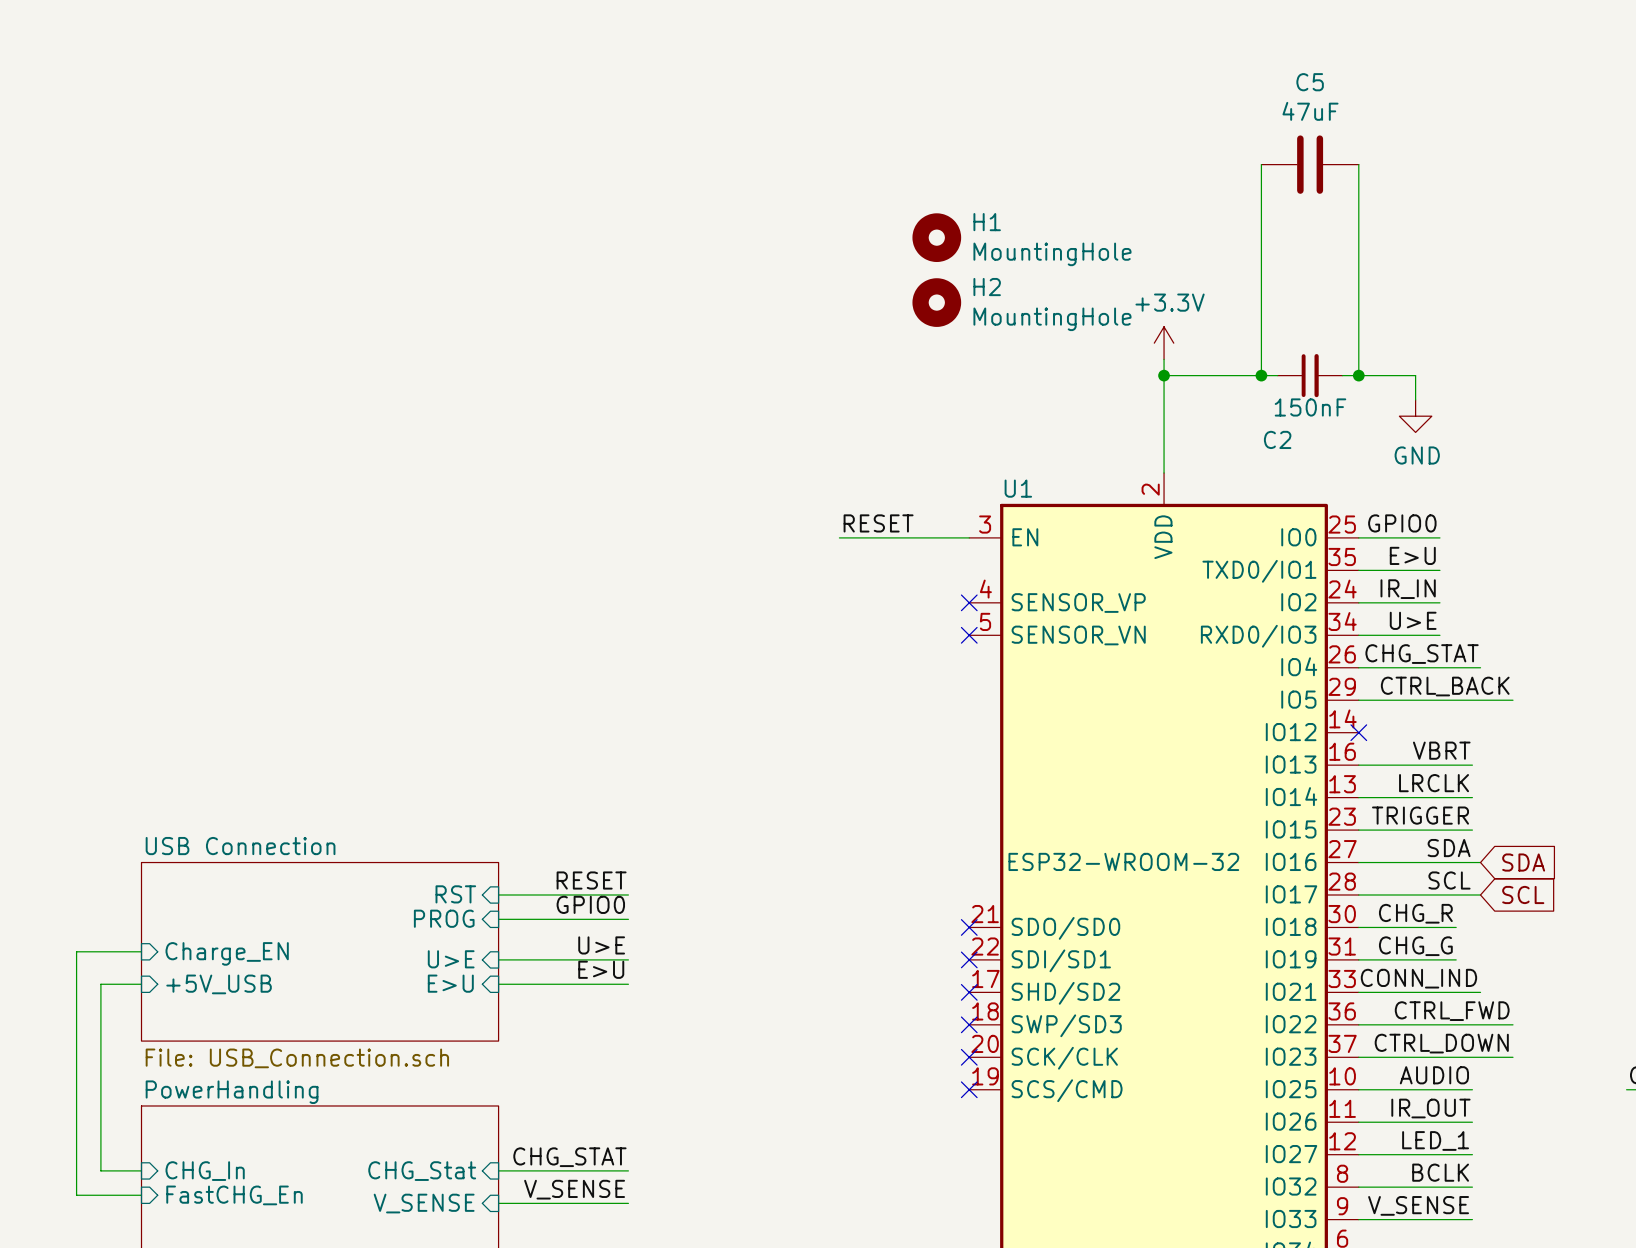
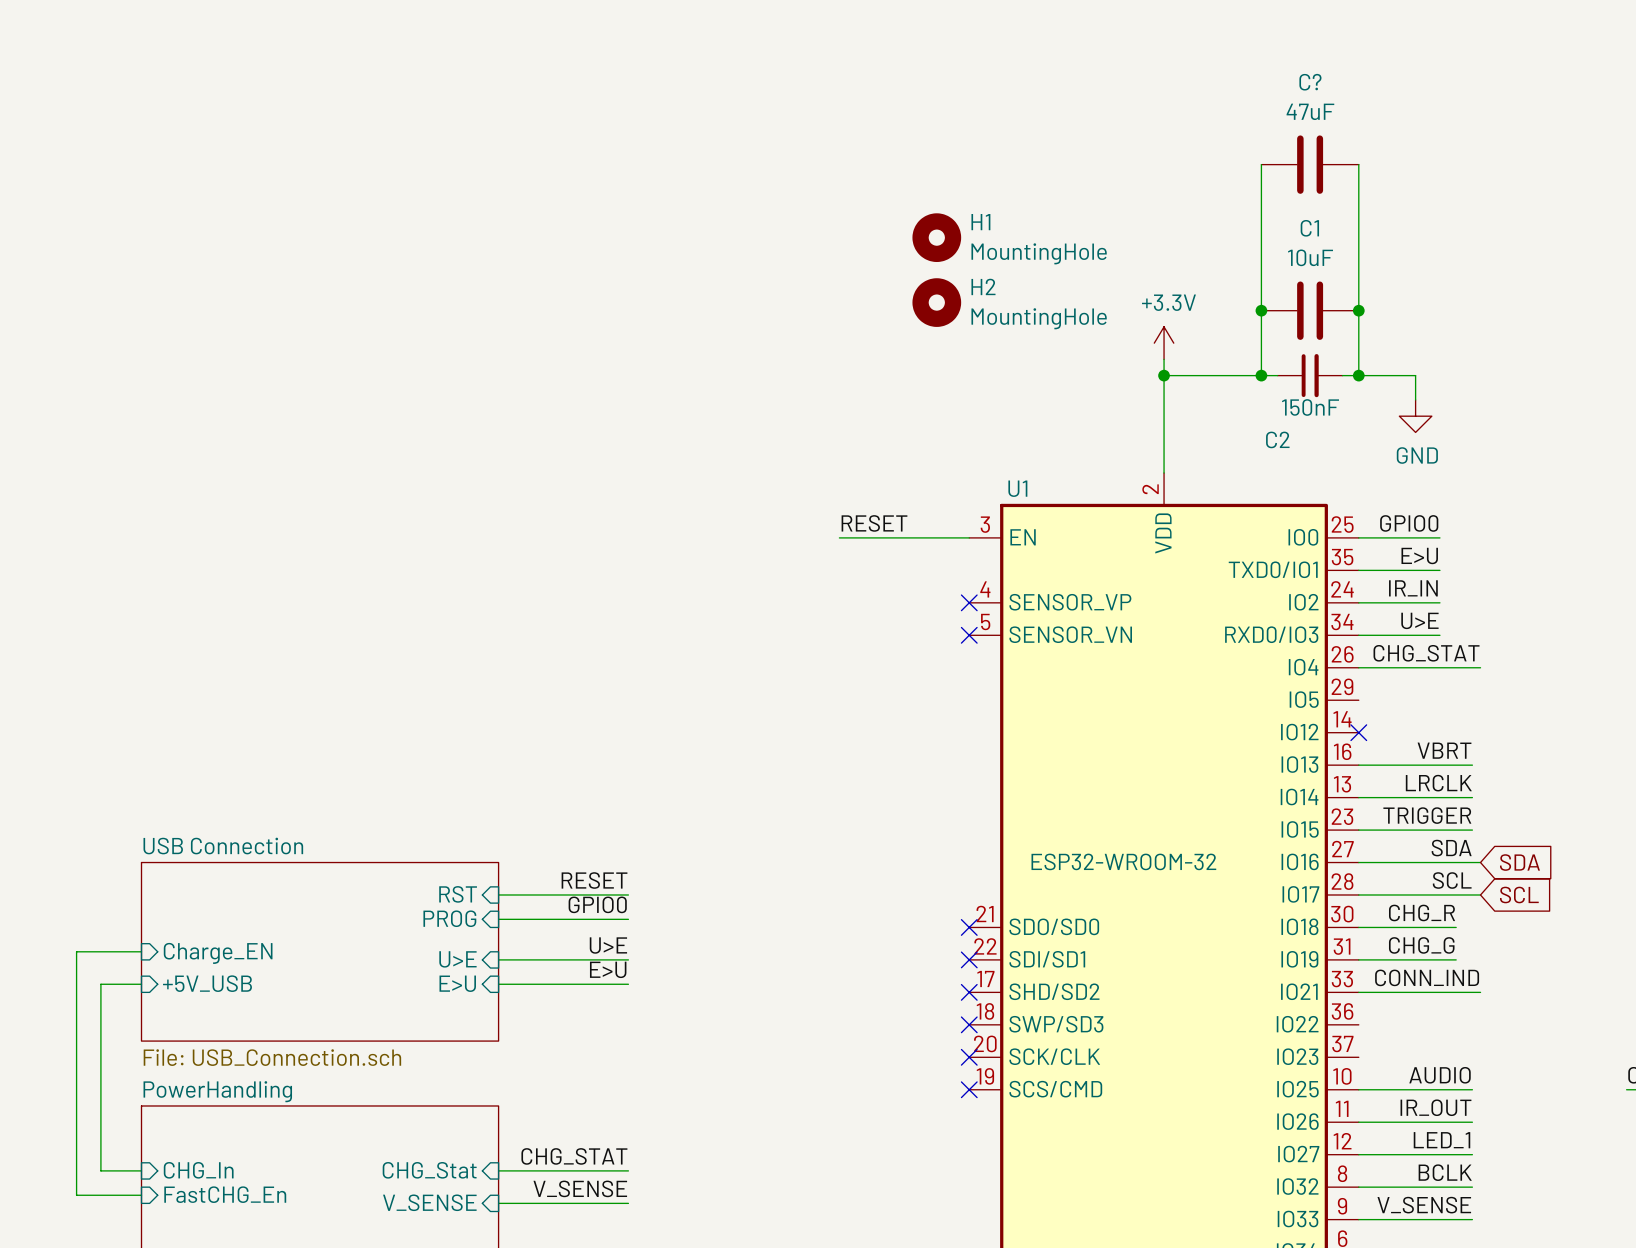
C5 name: C5 (1310, 82) -> C? (1310, 82)
junction: none -> (1261, 310)
C1: none -> 10uF (1310, 310)
junction: none -> (1358, 310)
label: CTRL_BACK (1445, 686) -> none
wire: (1358, 700) (1512, 700) -> none
label: CTRL_FWD (1452, 1011) -> none
wire: (1358, 1024) (1512, 1024) -> none
label: CTRL_DOWN (1441, 1043) -> none
wire: (1358, 1057) (1512, 1057) -> none

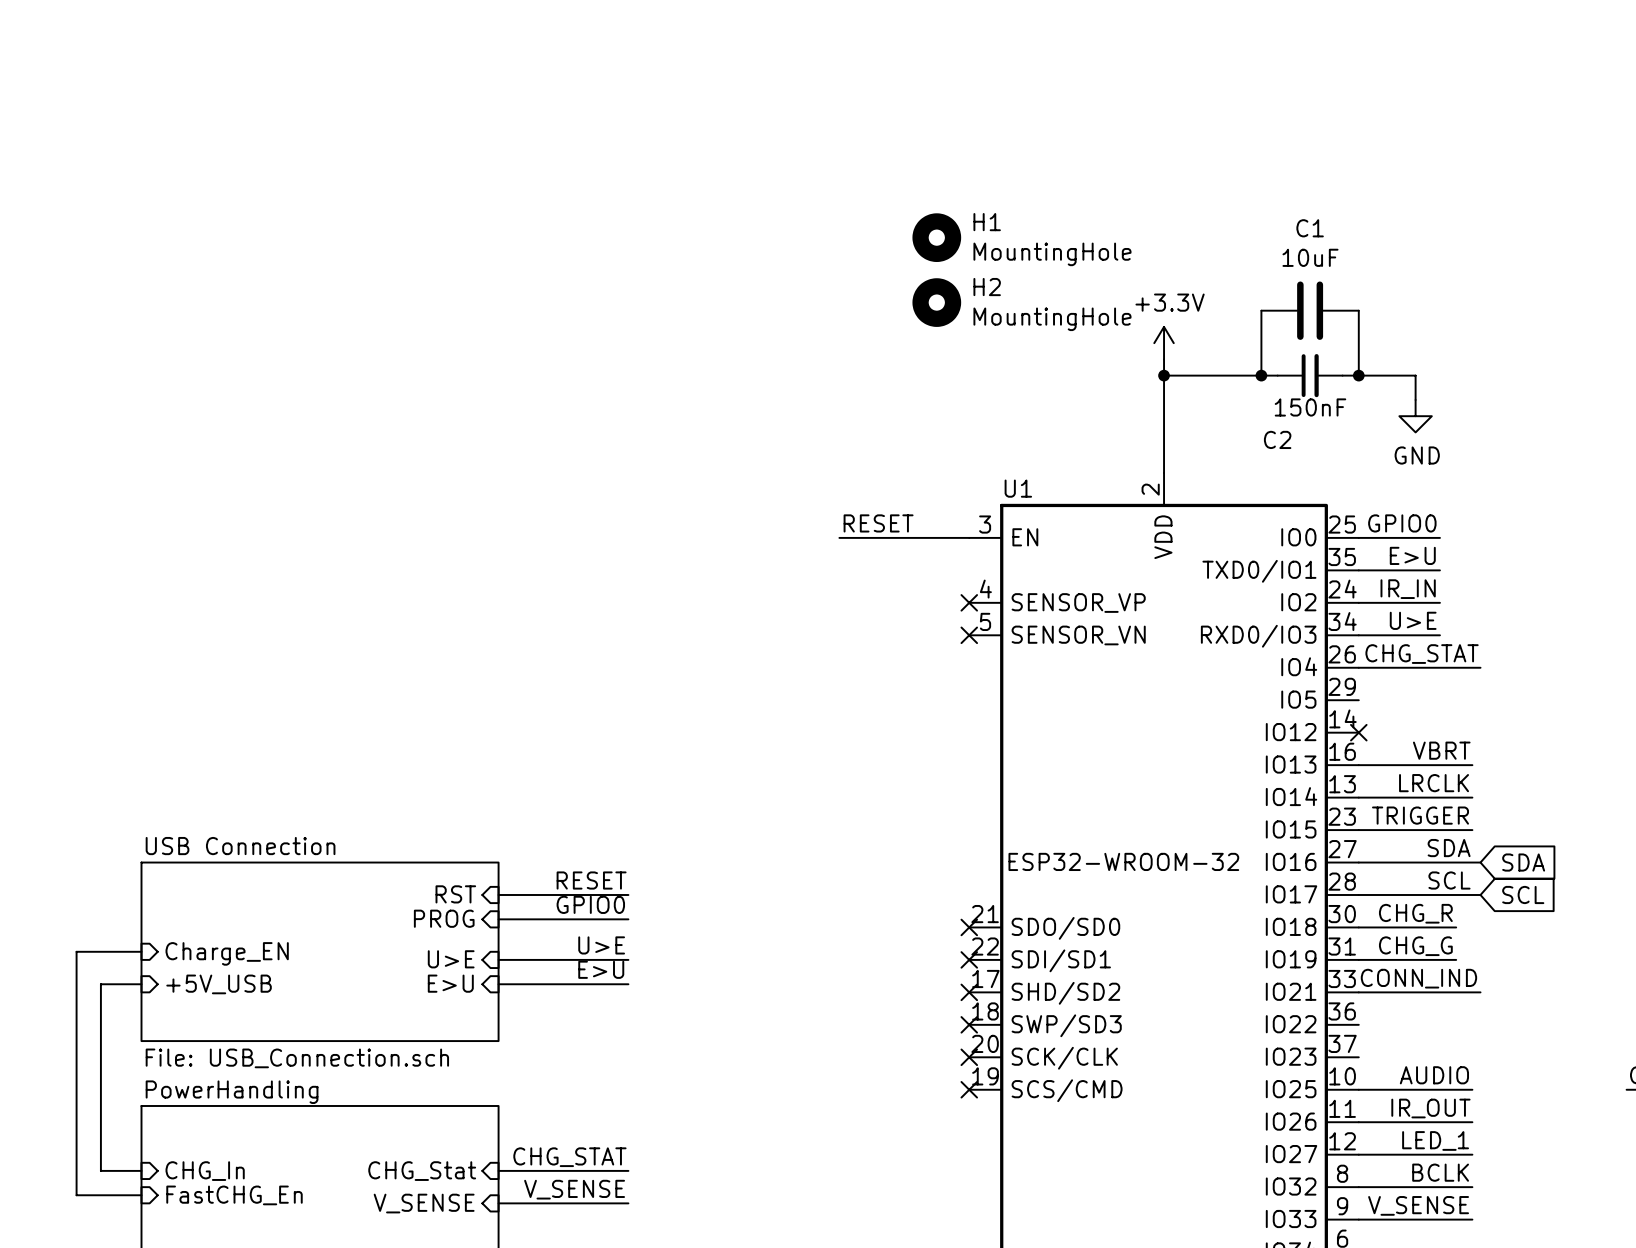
wire: (1261, 164) (1261, 310) -> none
C?: 47uF (1310, 164) -> none
wire: (1358, 164) (1358, 310) -> none
junction: (1261, 310) -> none
junction: (1358, 310) -> none

